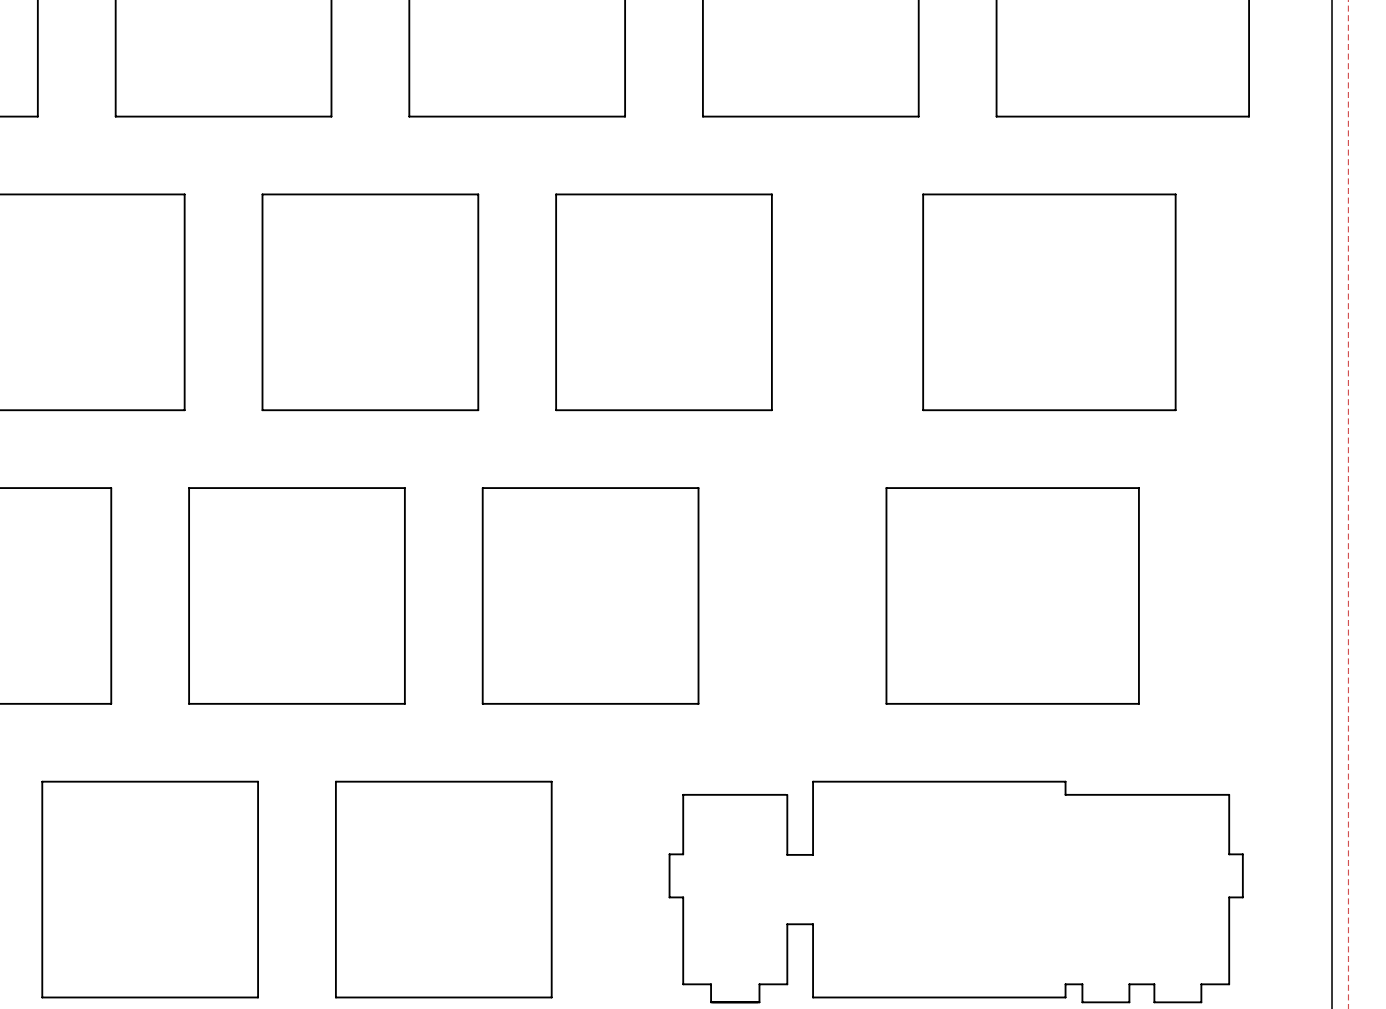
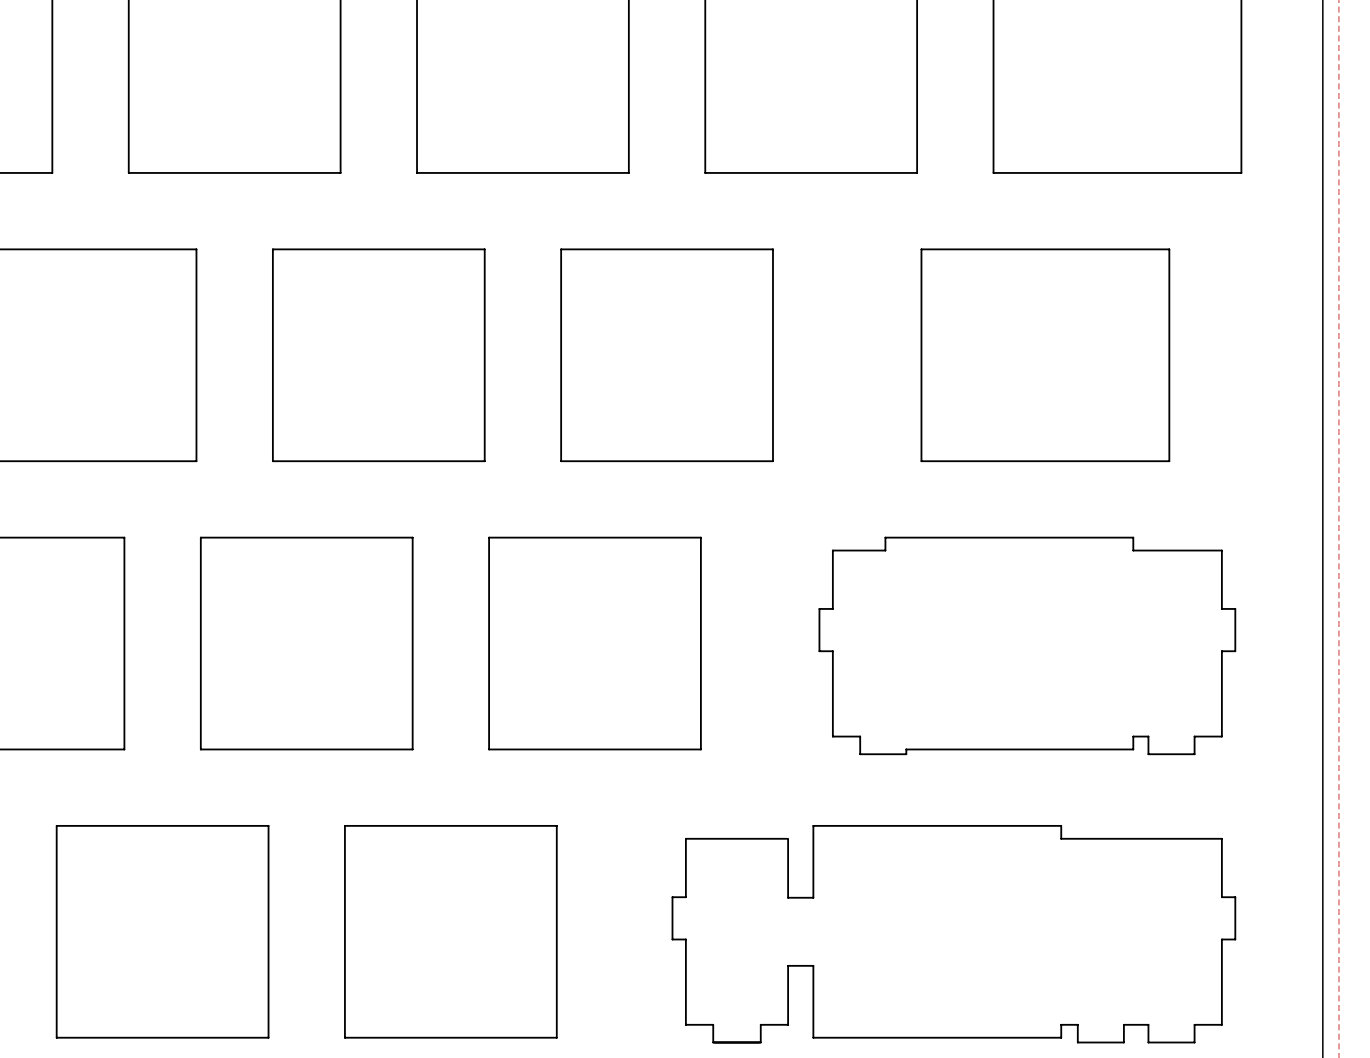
drawing: none -> [818, 536, 1237, 756]
drawing: [885, 487, 1140, 705] -> none

